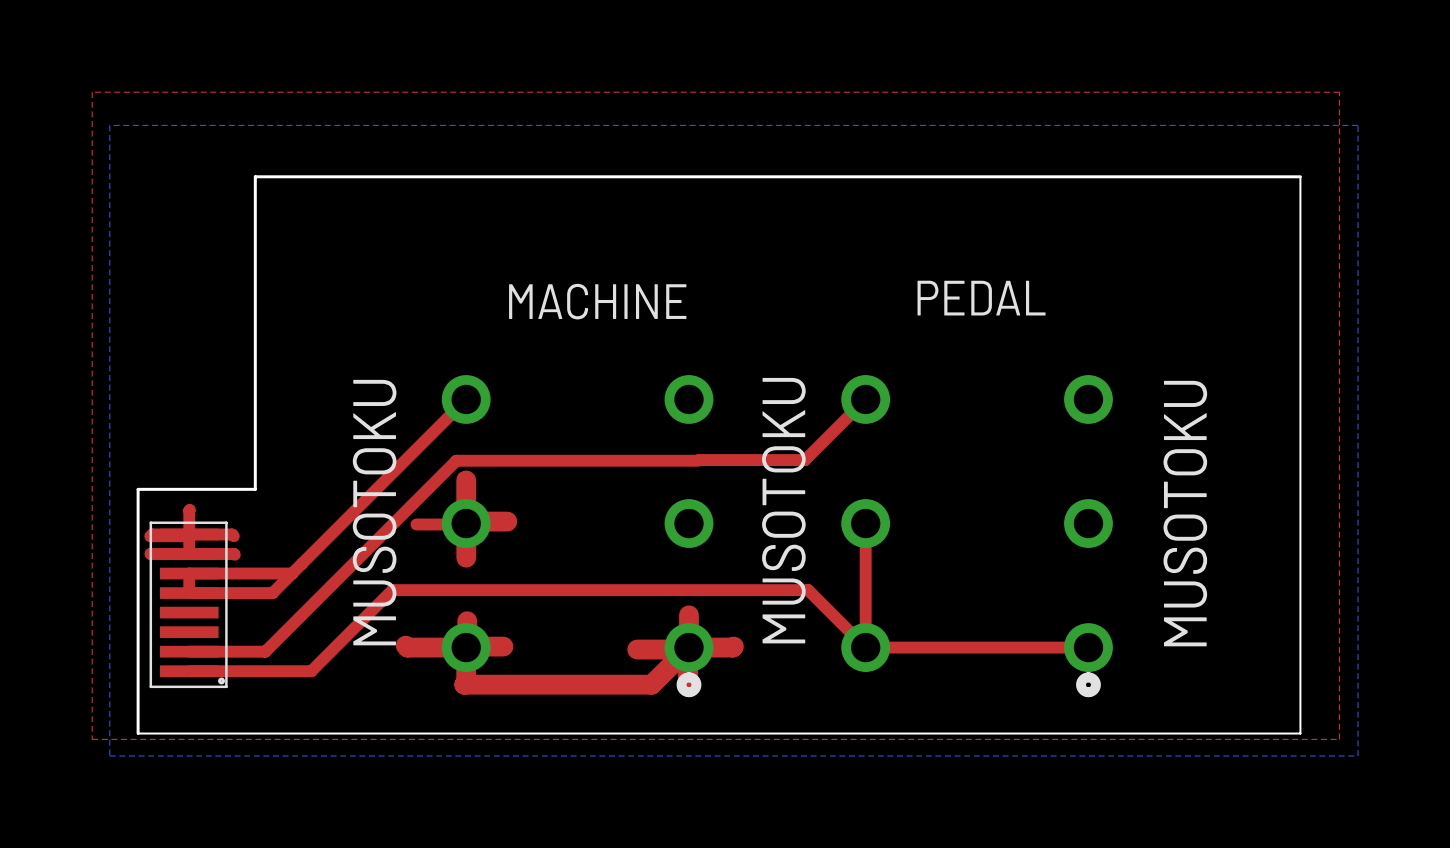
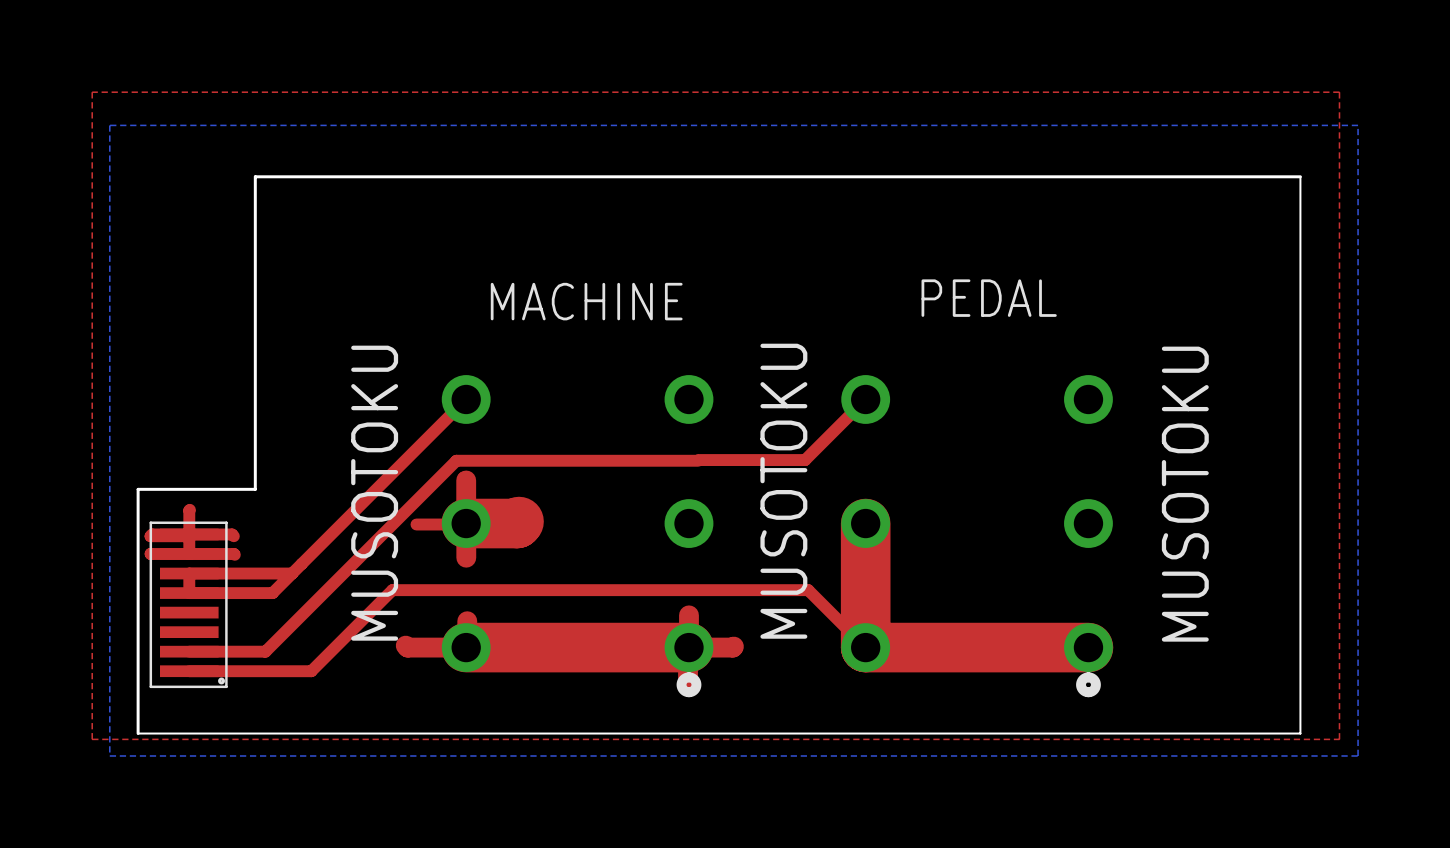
top track: none -> (519, 521) (517, 523) (466, 523)
top track width: thin (865, 523) (865, 647) (1088, 647) -> thick (865, 523) (865, 647) (1088, 647)
top track: (466, 647) (466, 682) (464, 684) (651, 684) (687, 649) -> (466, 647) (688, 647)

